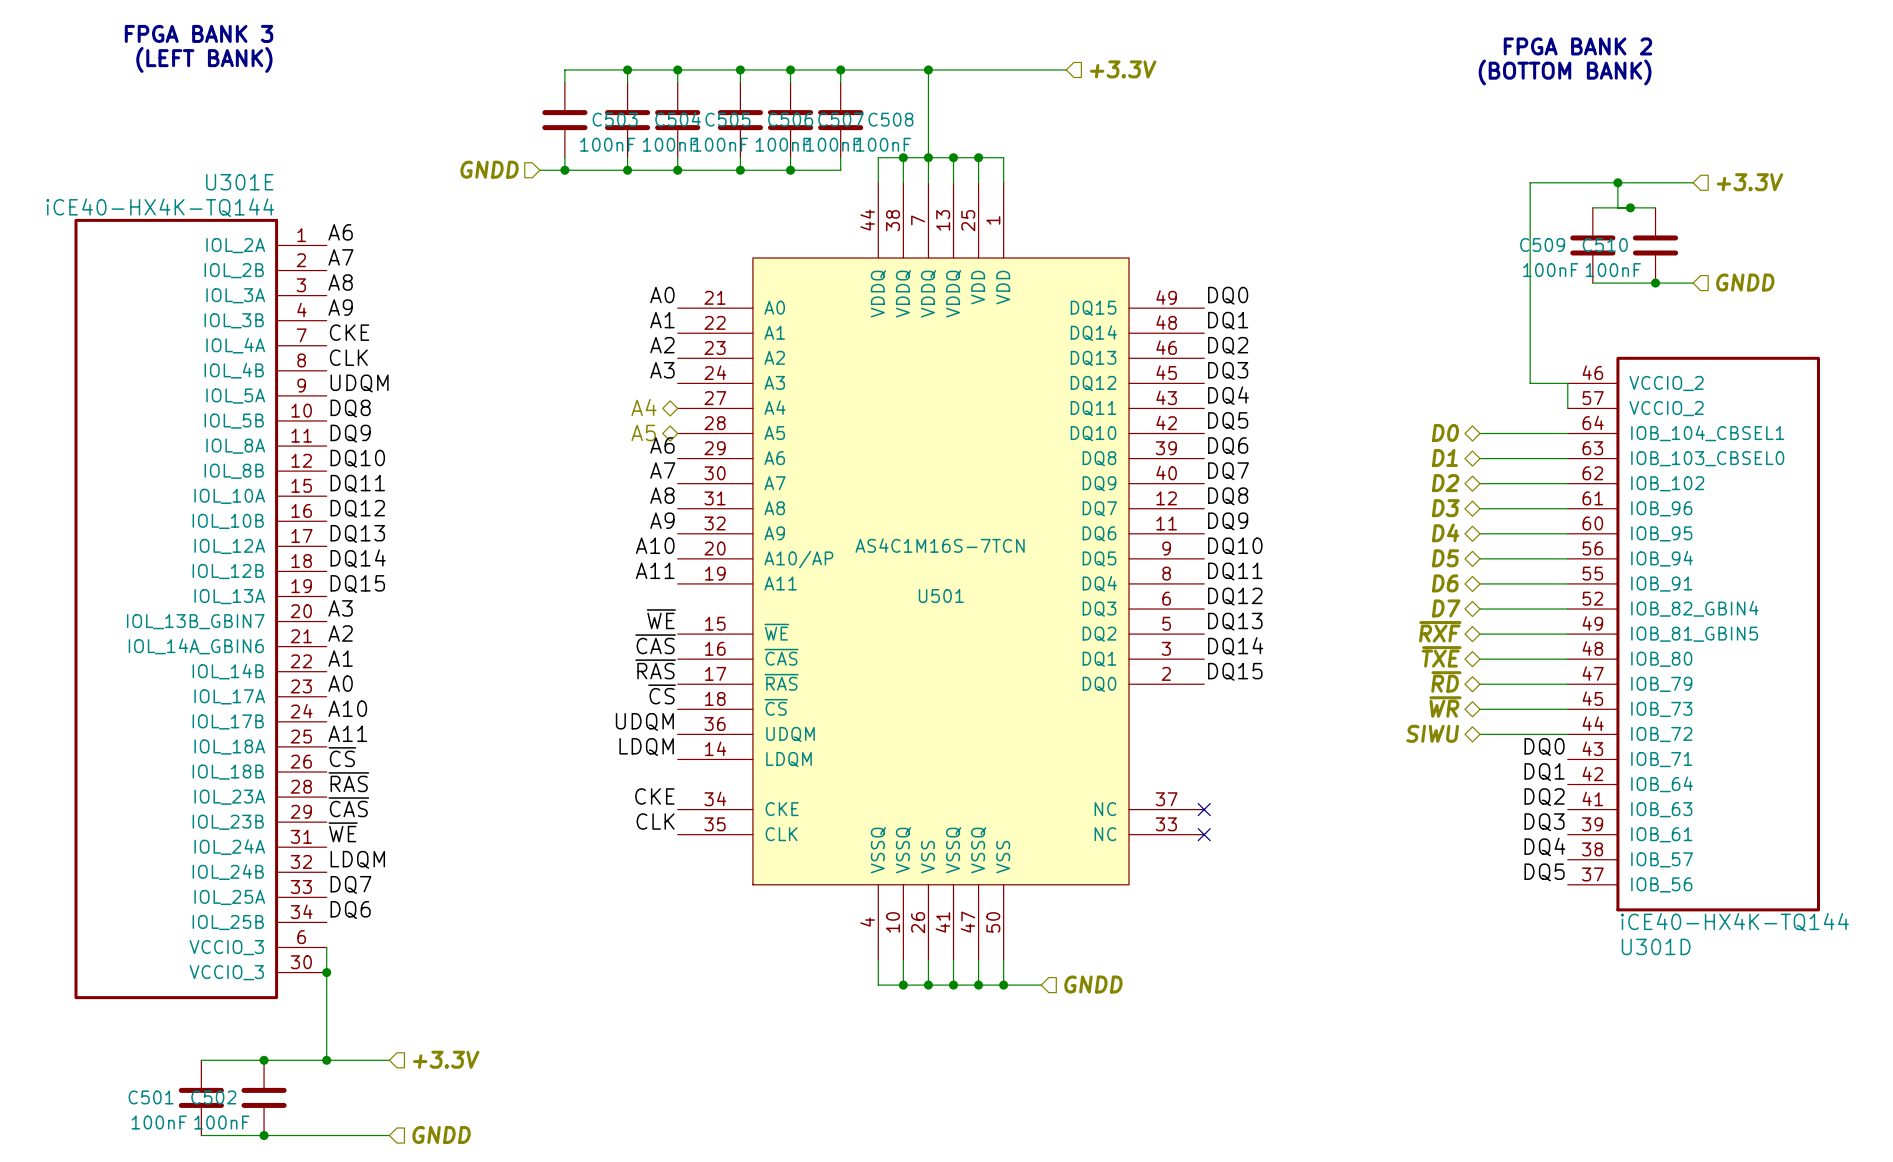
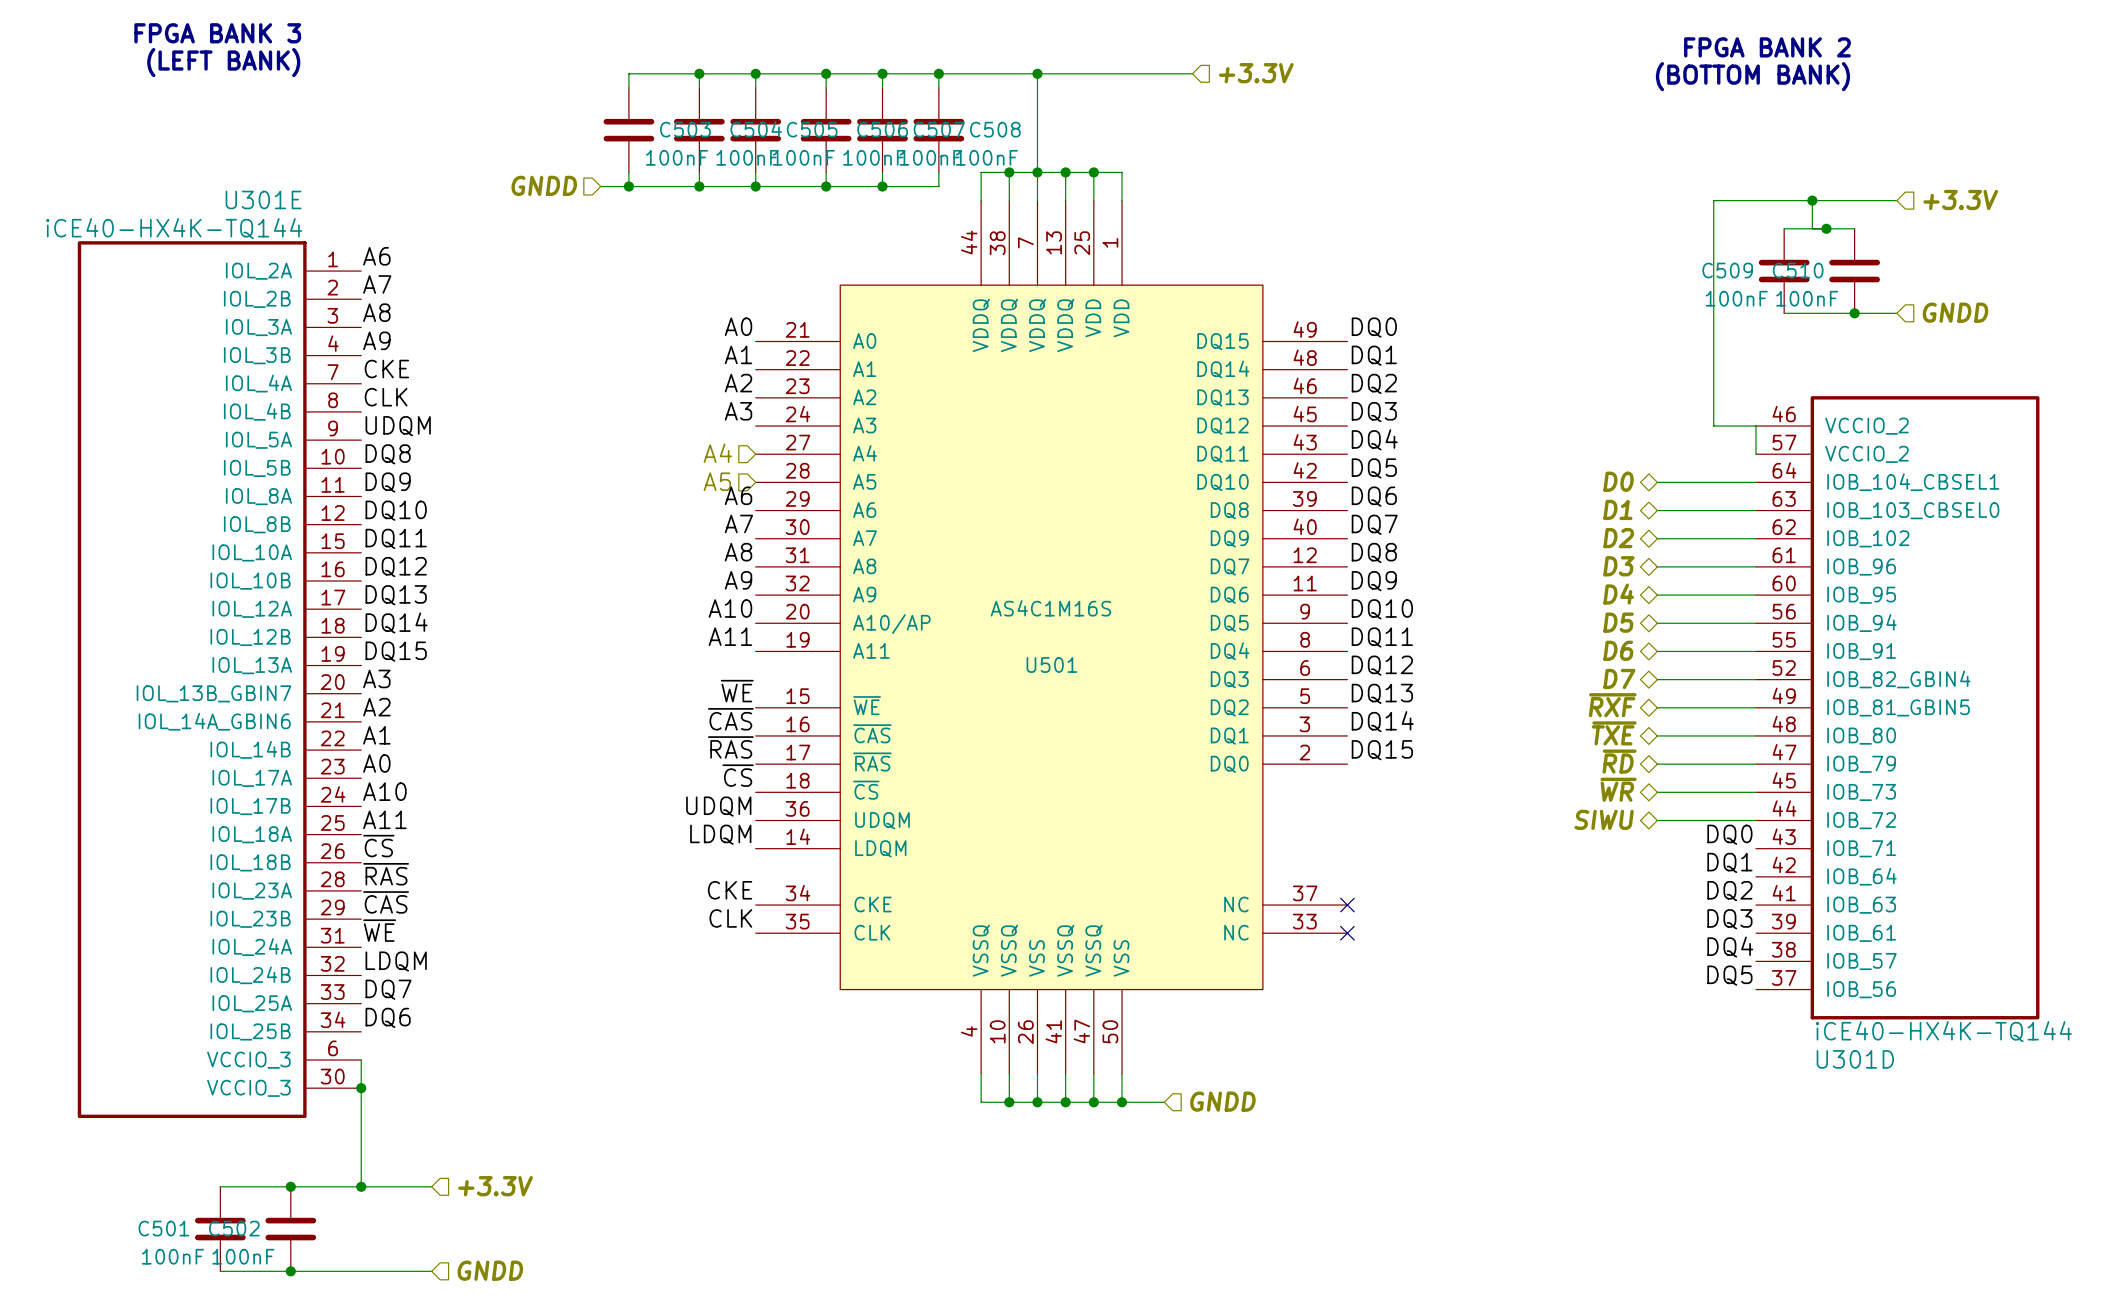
hierarchical label shape: bidirectional (643, 407) -> input (717, 453)
hierarchical label shape: bidirectional (643, 432) -> input (717, 481)
U501 value: AS4C1M16S-7TCN (940, 545) -> AS4C1M16S (1050, 608)

